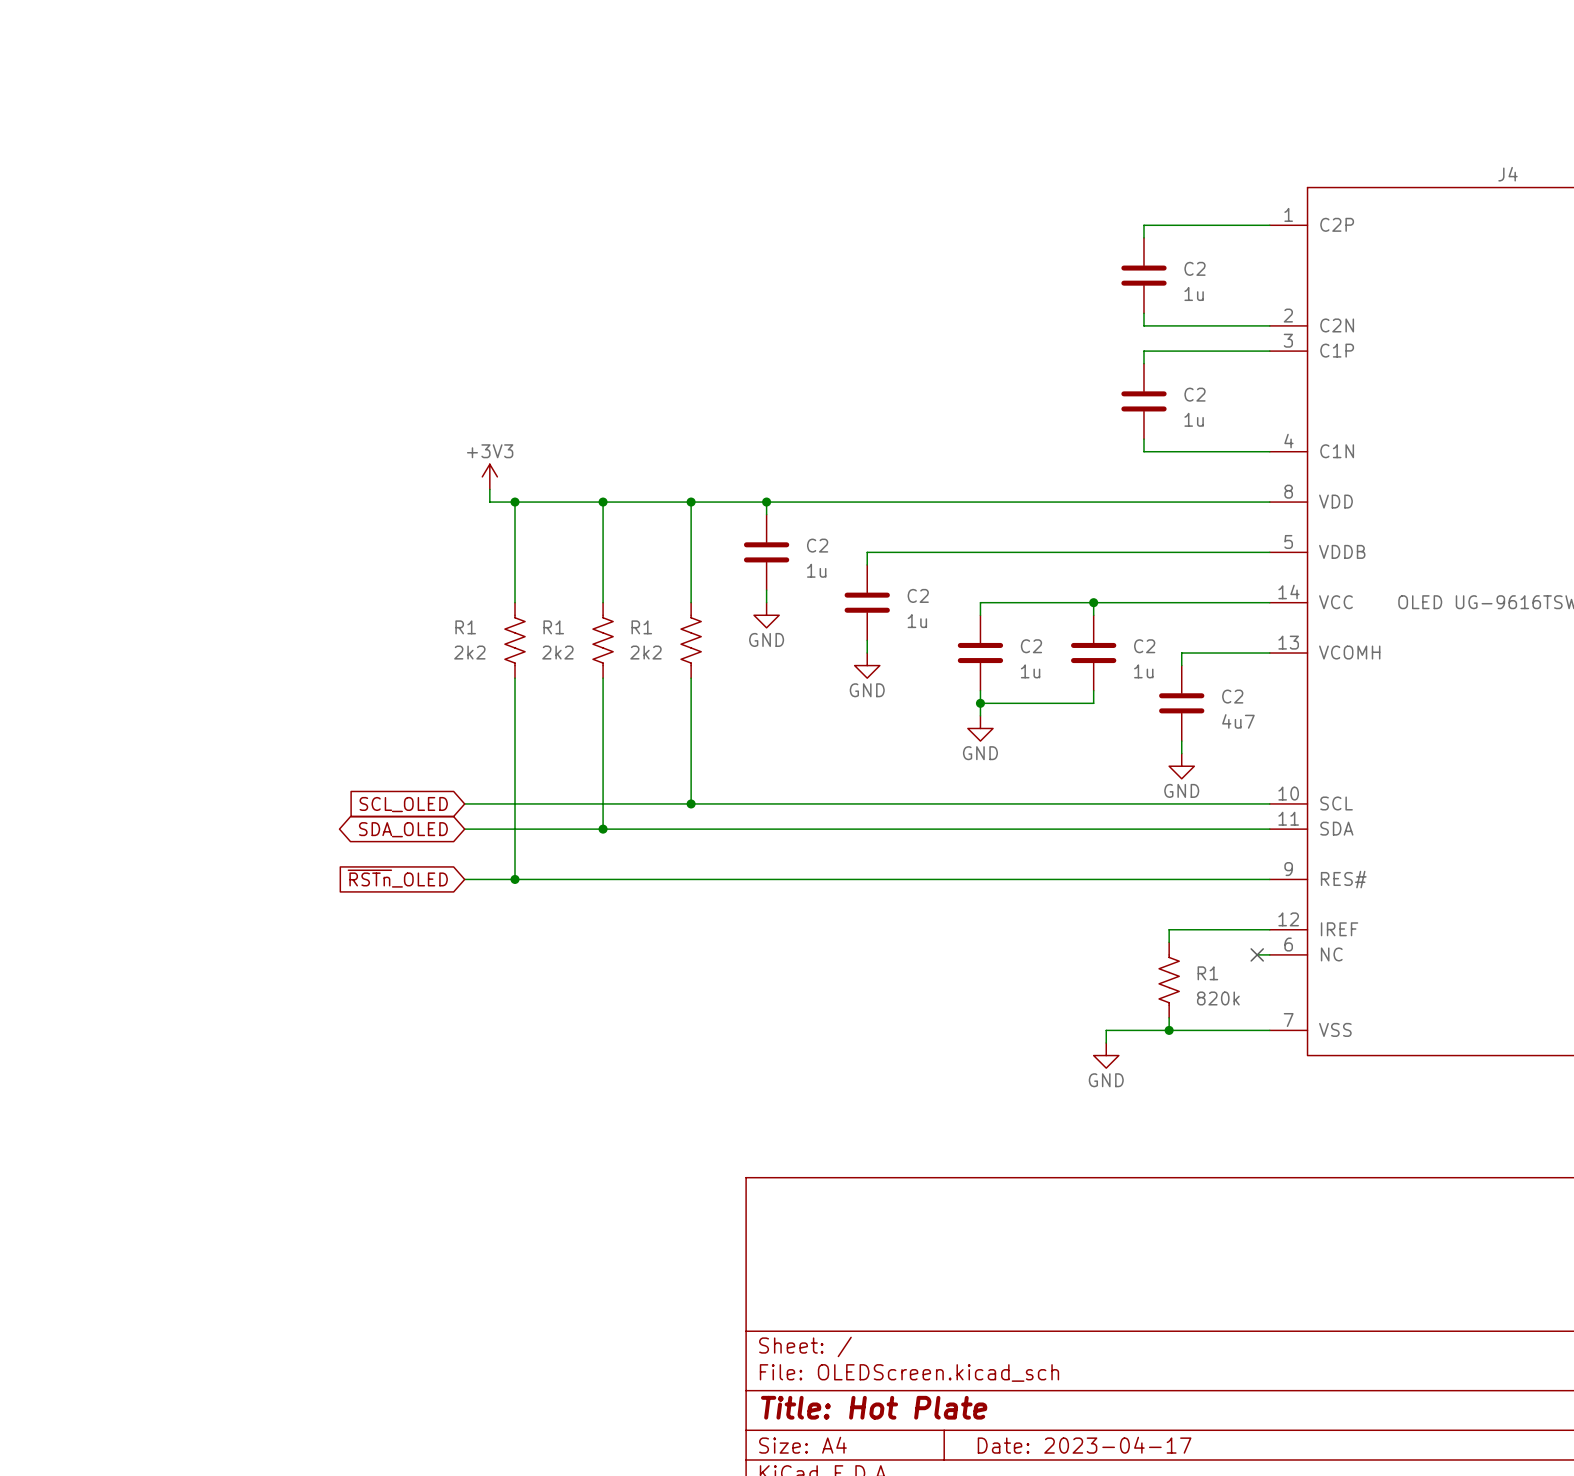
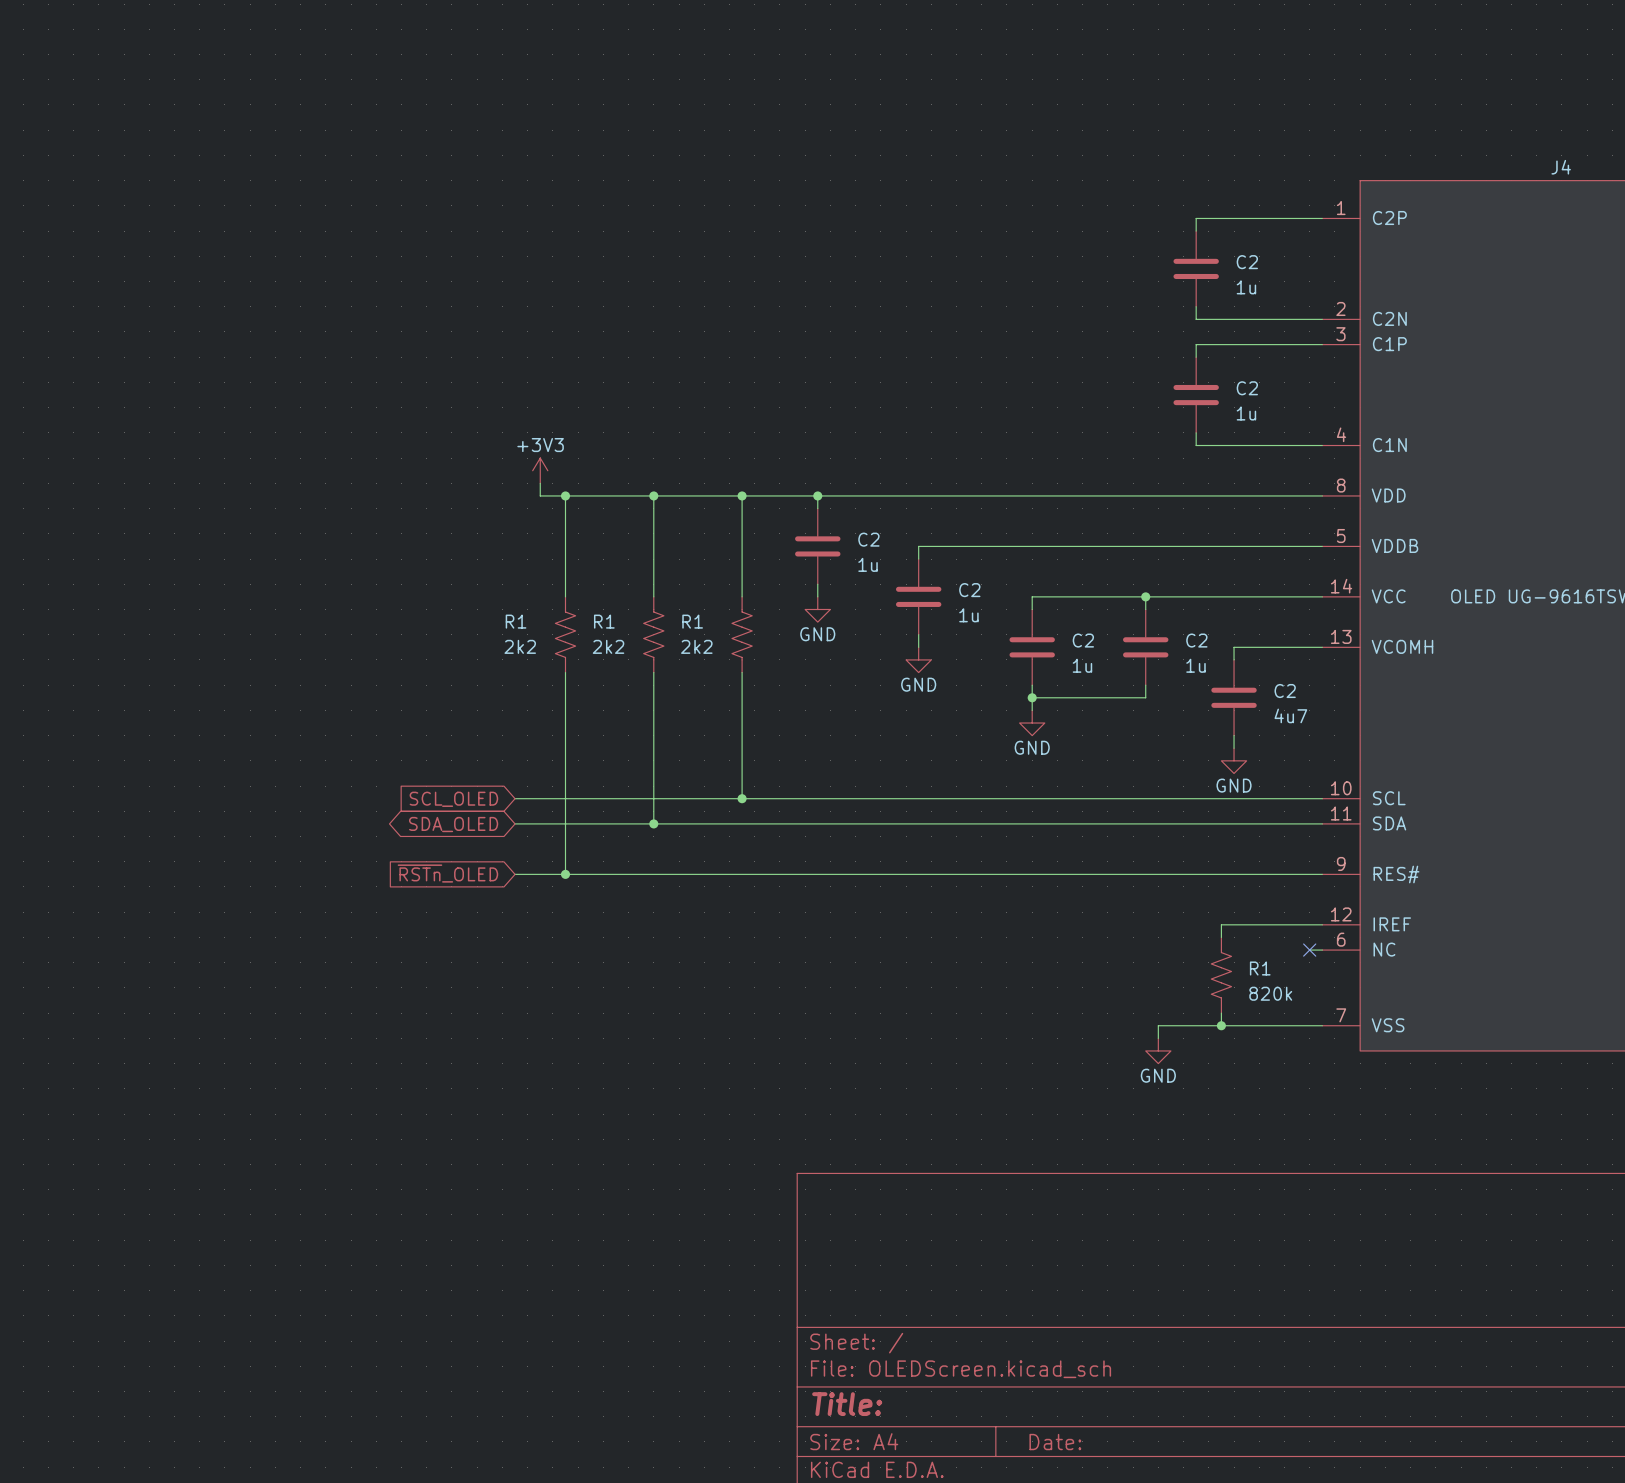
title block: Title: Hot Plate (874, 1407) -> Title: (847, 1404)
title block: Date: 2023-04-17 (1084, 1445) -> Date: (1055, 1442)

